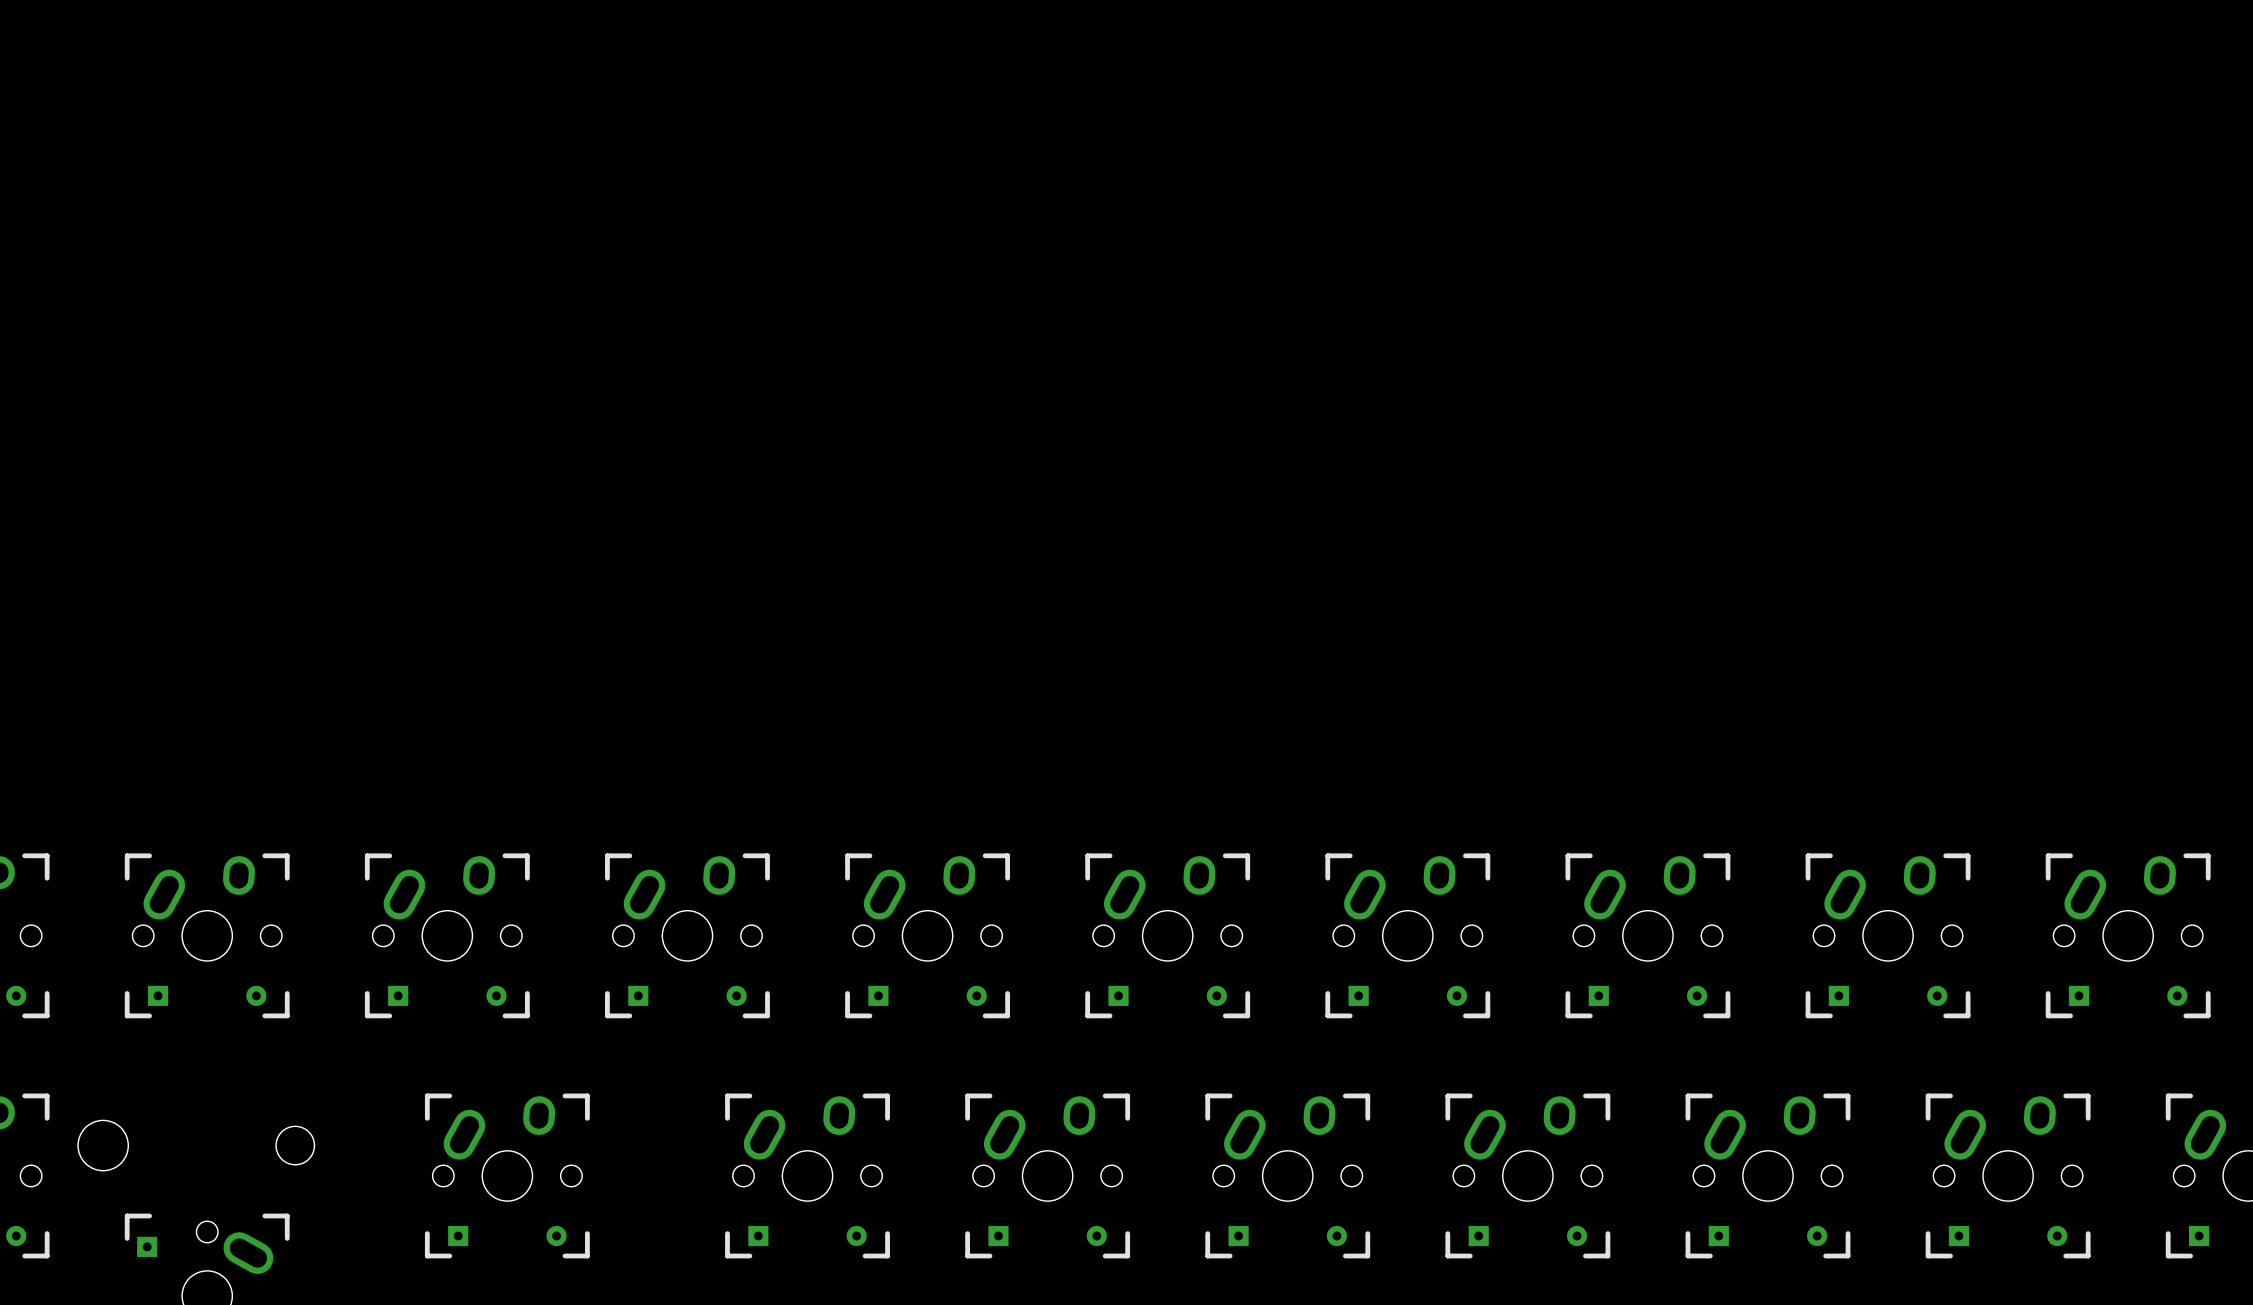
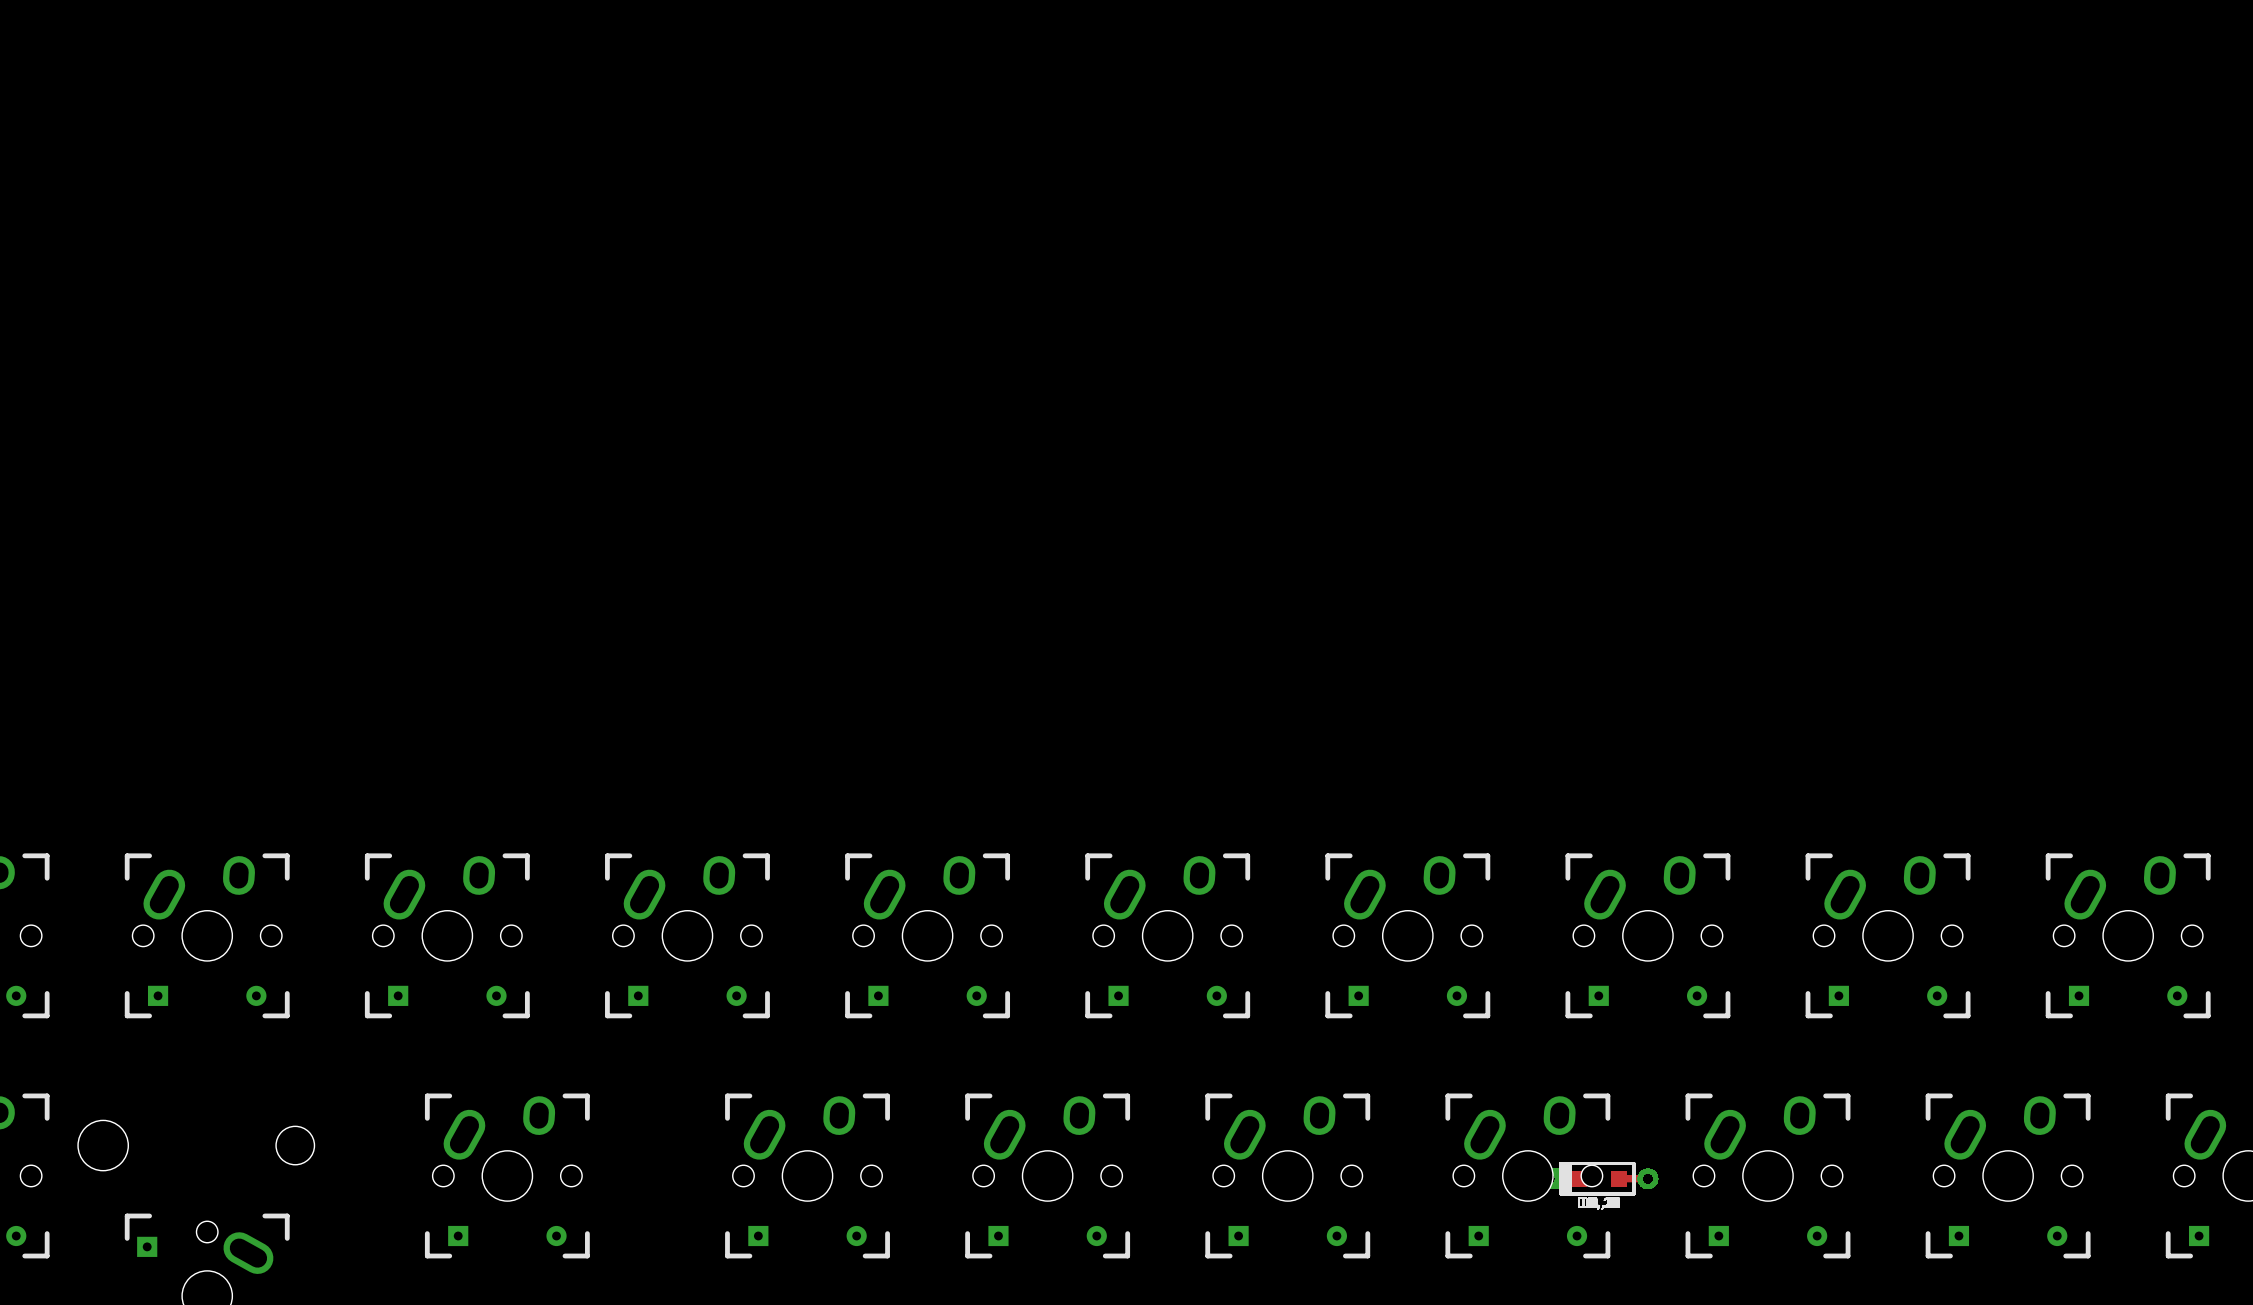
part: none -> (1598, 1178)
part: none -> (1598, 1178)
part: none -> (1598, 1178)
part: none -> (1598, 1178)
part: none -> (1598, 1178)
part: none -> (1598, 1178)
part: none -> (1598, 1178)
part: none -> (1598, 1178)
part: none -> (1598, 1178)
part: none -> (1598, 1178)
part: none -> (1598, 1178)
part: none -> (1598, 1178)
part: none -> (1598, 1178)
part: none -> (1598, 1178)
part: none -> (1598, 1178)
part: none -> (1598, 1178)
part: none -> (1598, 1178)
part: none -> (1598, 1178)
part: none -> (1598, 1178)
part: none -> (1598, 1178)
part: none -> (1598, 1178)
part: none -> (1598, 1178)
part: none -> (1598, 1178)
part: none -> (1598, 1178)
part: none -> (1598, 1178)
part: none -> (1598, 1178)
part: none -> (1598, 1178)
part: none -> (1598, 1178)
part: none -> (1598, 1178)
part: none -> (1598, 1178)
part: none -> (1598, 1178)
part: none -> (1598, 1178)
part: none -> (1598, 1178)
part: none -> (1598, 1178)
part: none -> (1598, 1178)
part: none -> (1598, 1178)
part: none -> (1598, 1178)
part: none -> (1598, 1178)
part: none -> (1598, 1178)
part: none -> (1598, 1178)
part: none -> (1598, 1178)
part: none -> (1598, 1178)
part: none -> (1598, 1178)
part: none -> (1598, 1178)
part: none -> (1598, 1178)
part: none -> (1598, 1178)
part: none -> (1598, 1178)
part: none -> (1598, 1178)
part: none -> (1598, 1178)
part: none -> (1598, 1178)
part: none -> (1598, 1178)
part: none -> (1598, 1178)
part: none -> (1598, 1178)
part: none -> (1598, 1178)
part: none -> (1598, 1178)
part: none -> (1598, 1178)
part: none -> (1598, 1178)
part: none -> (1598, 1178)
part: none -> (1598, 1178)
part: none -> (1598, 1178)
part: none -> (1598, 1178)
part: none -> (1598, 1178)
part: none -> (1598, 1178)
part: none -> (1598, 1178)
part: none -> (1598, 1178)
part: none -> (1598, 1178)
part: none -> (1598, 1178)
part: none -> (1598, 1178)
part: none -> (1598, 1178)
part: none -> (1598, 1178)
part: none -> (1598, 1178)
part: none -> (1598, 1178)
part: none -> (1598, 1178)
part: none -> (1598, 1178)
part: none -> (1598, 1178)
part: none -> (1598, 1178)
part: none -> (1598, 1178)
part: none -> (1598, 1178)
part: none -> (1598, 1178)
part: none -> (1598, 1178)
part: none -> (1598, 1178)
part: none -> (1598, 1178)
part: none -> (1598, 1178)
part: none -> (1598, 1178)
part: none -> (1598, 1178)
part: none -> (1598, 1178)
part: none -> (1598, 1178)
part: none -> (1598, 1178)

